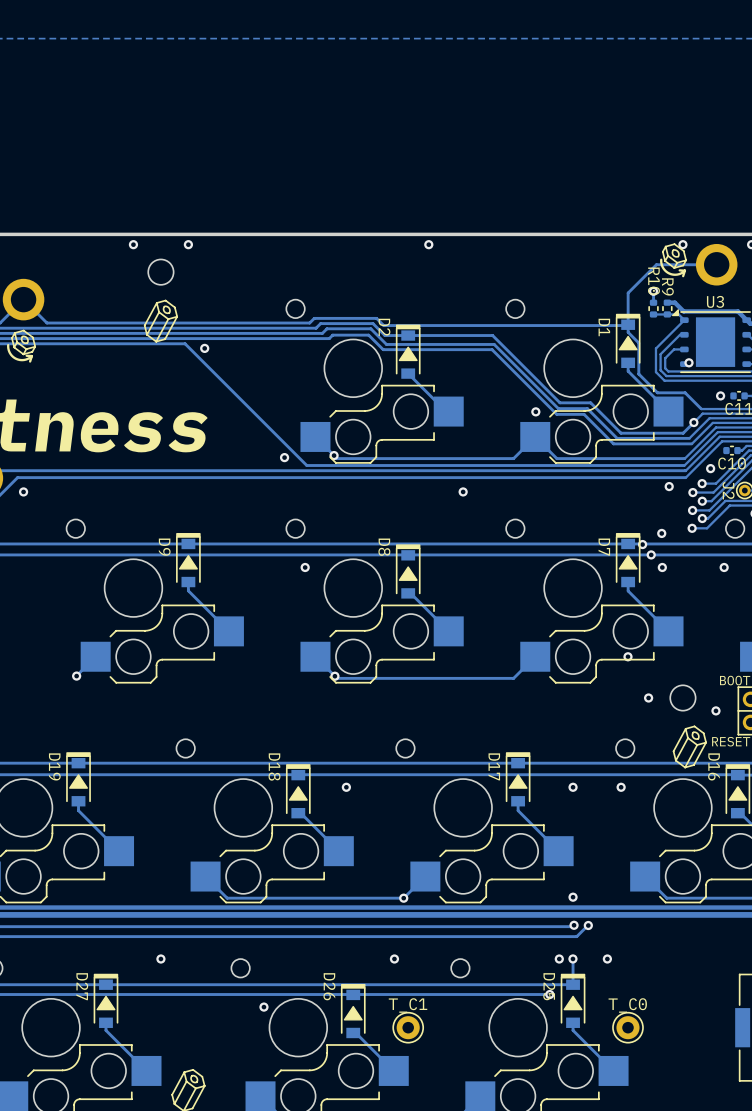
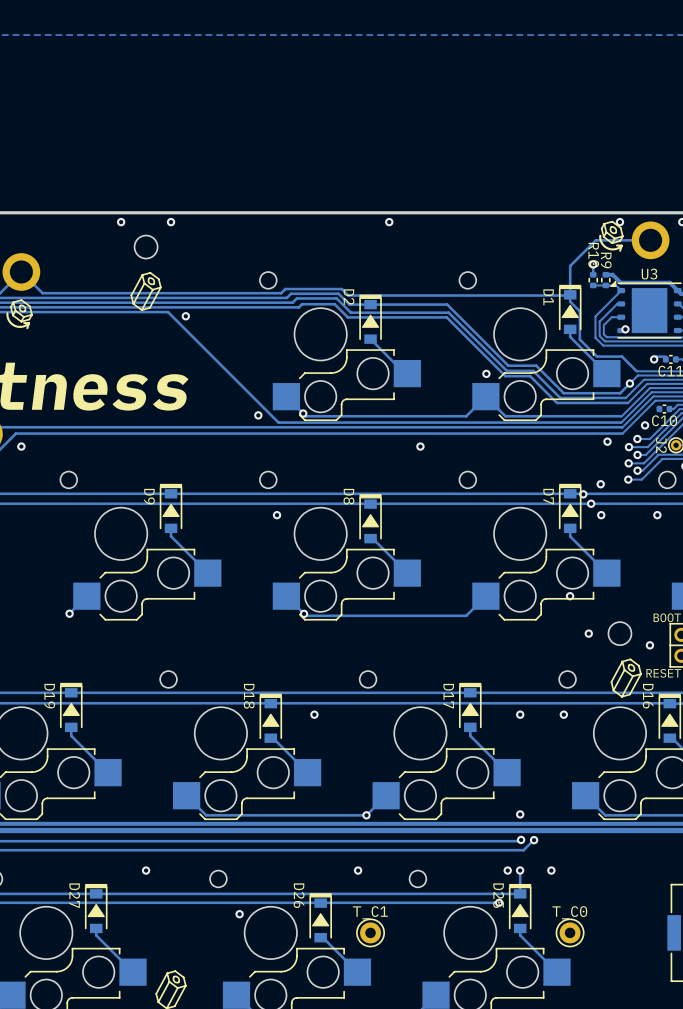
track: none -> (665, 356) (655, 357)

